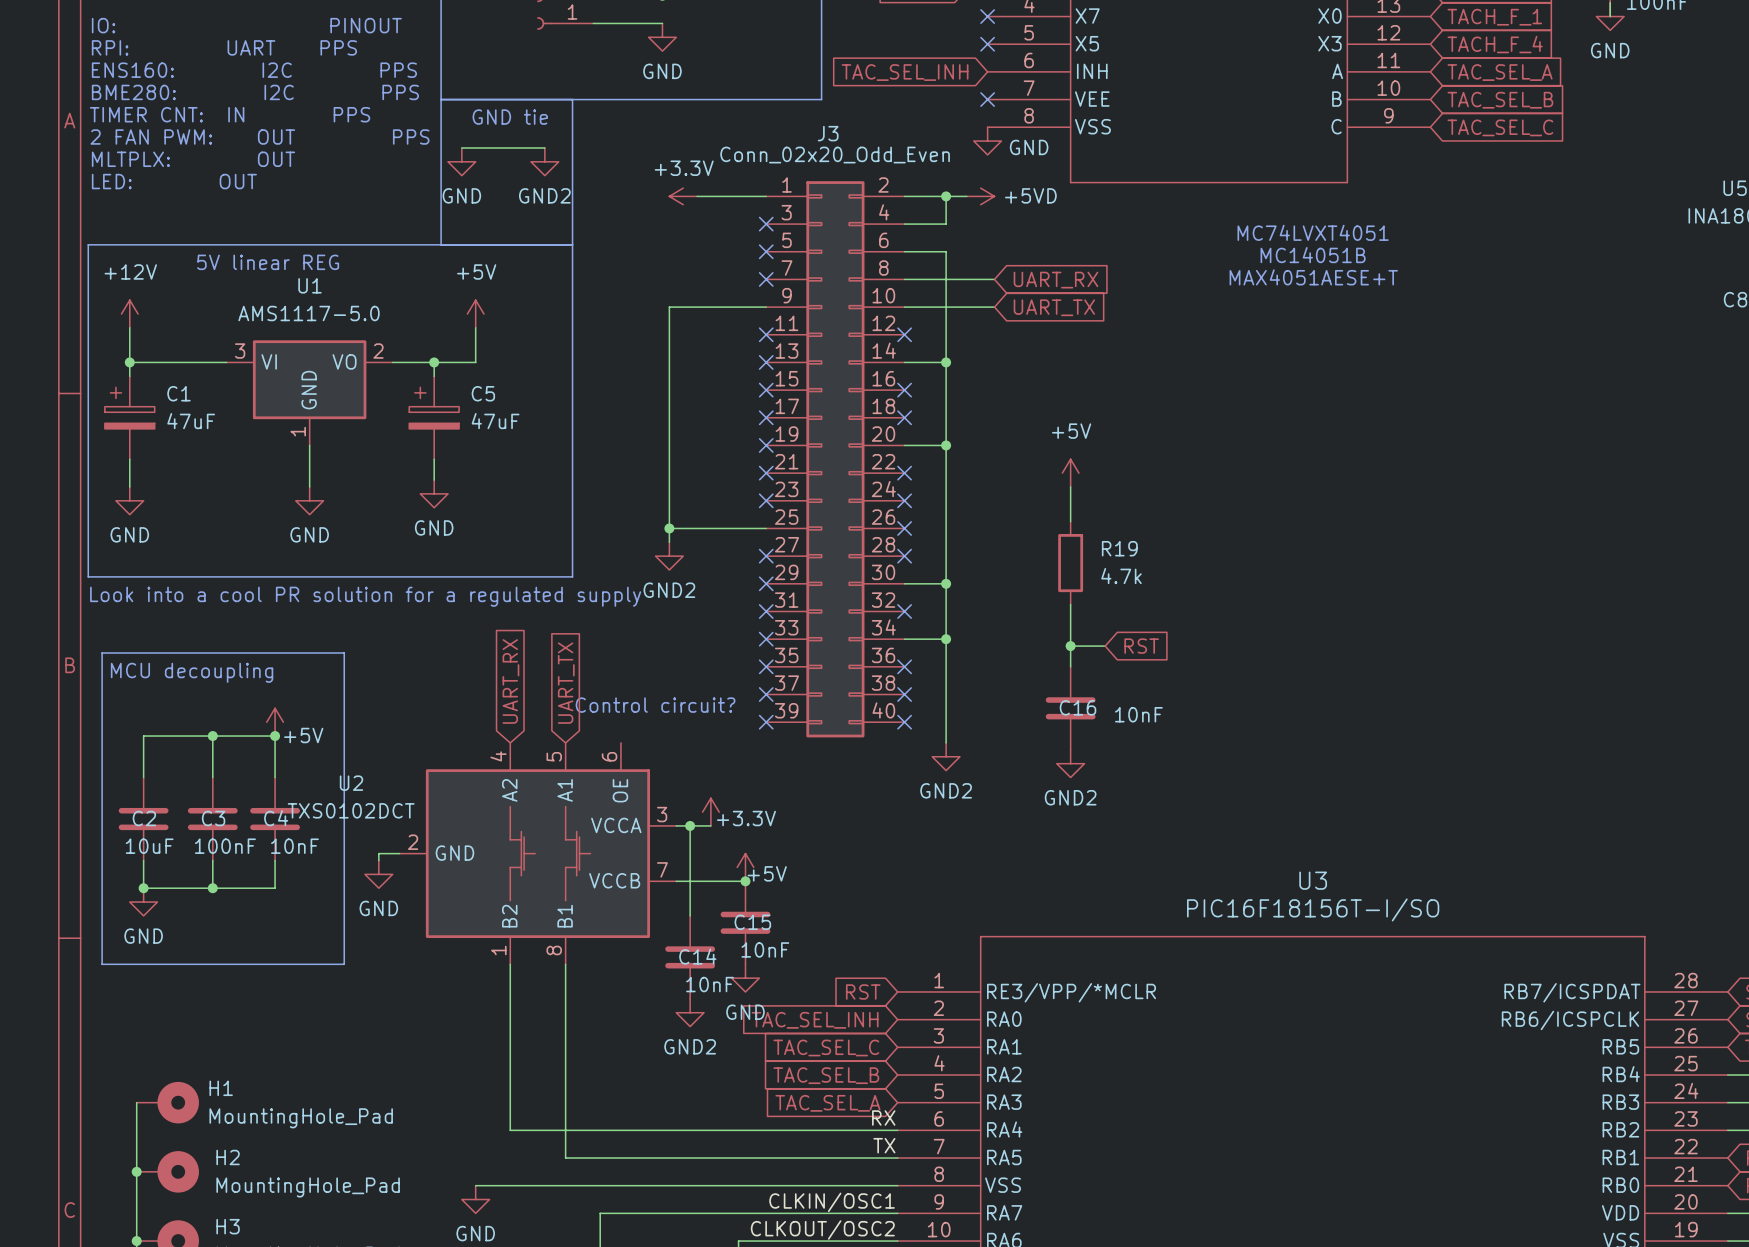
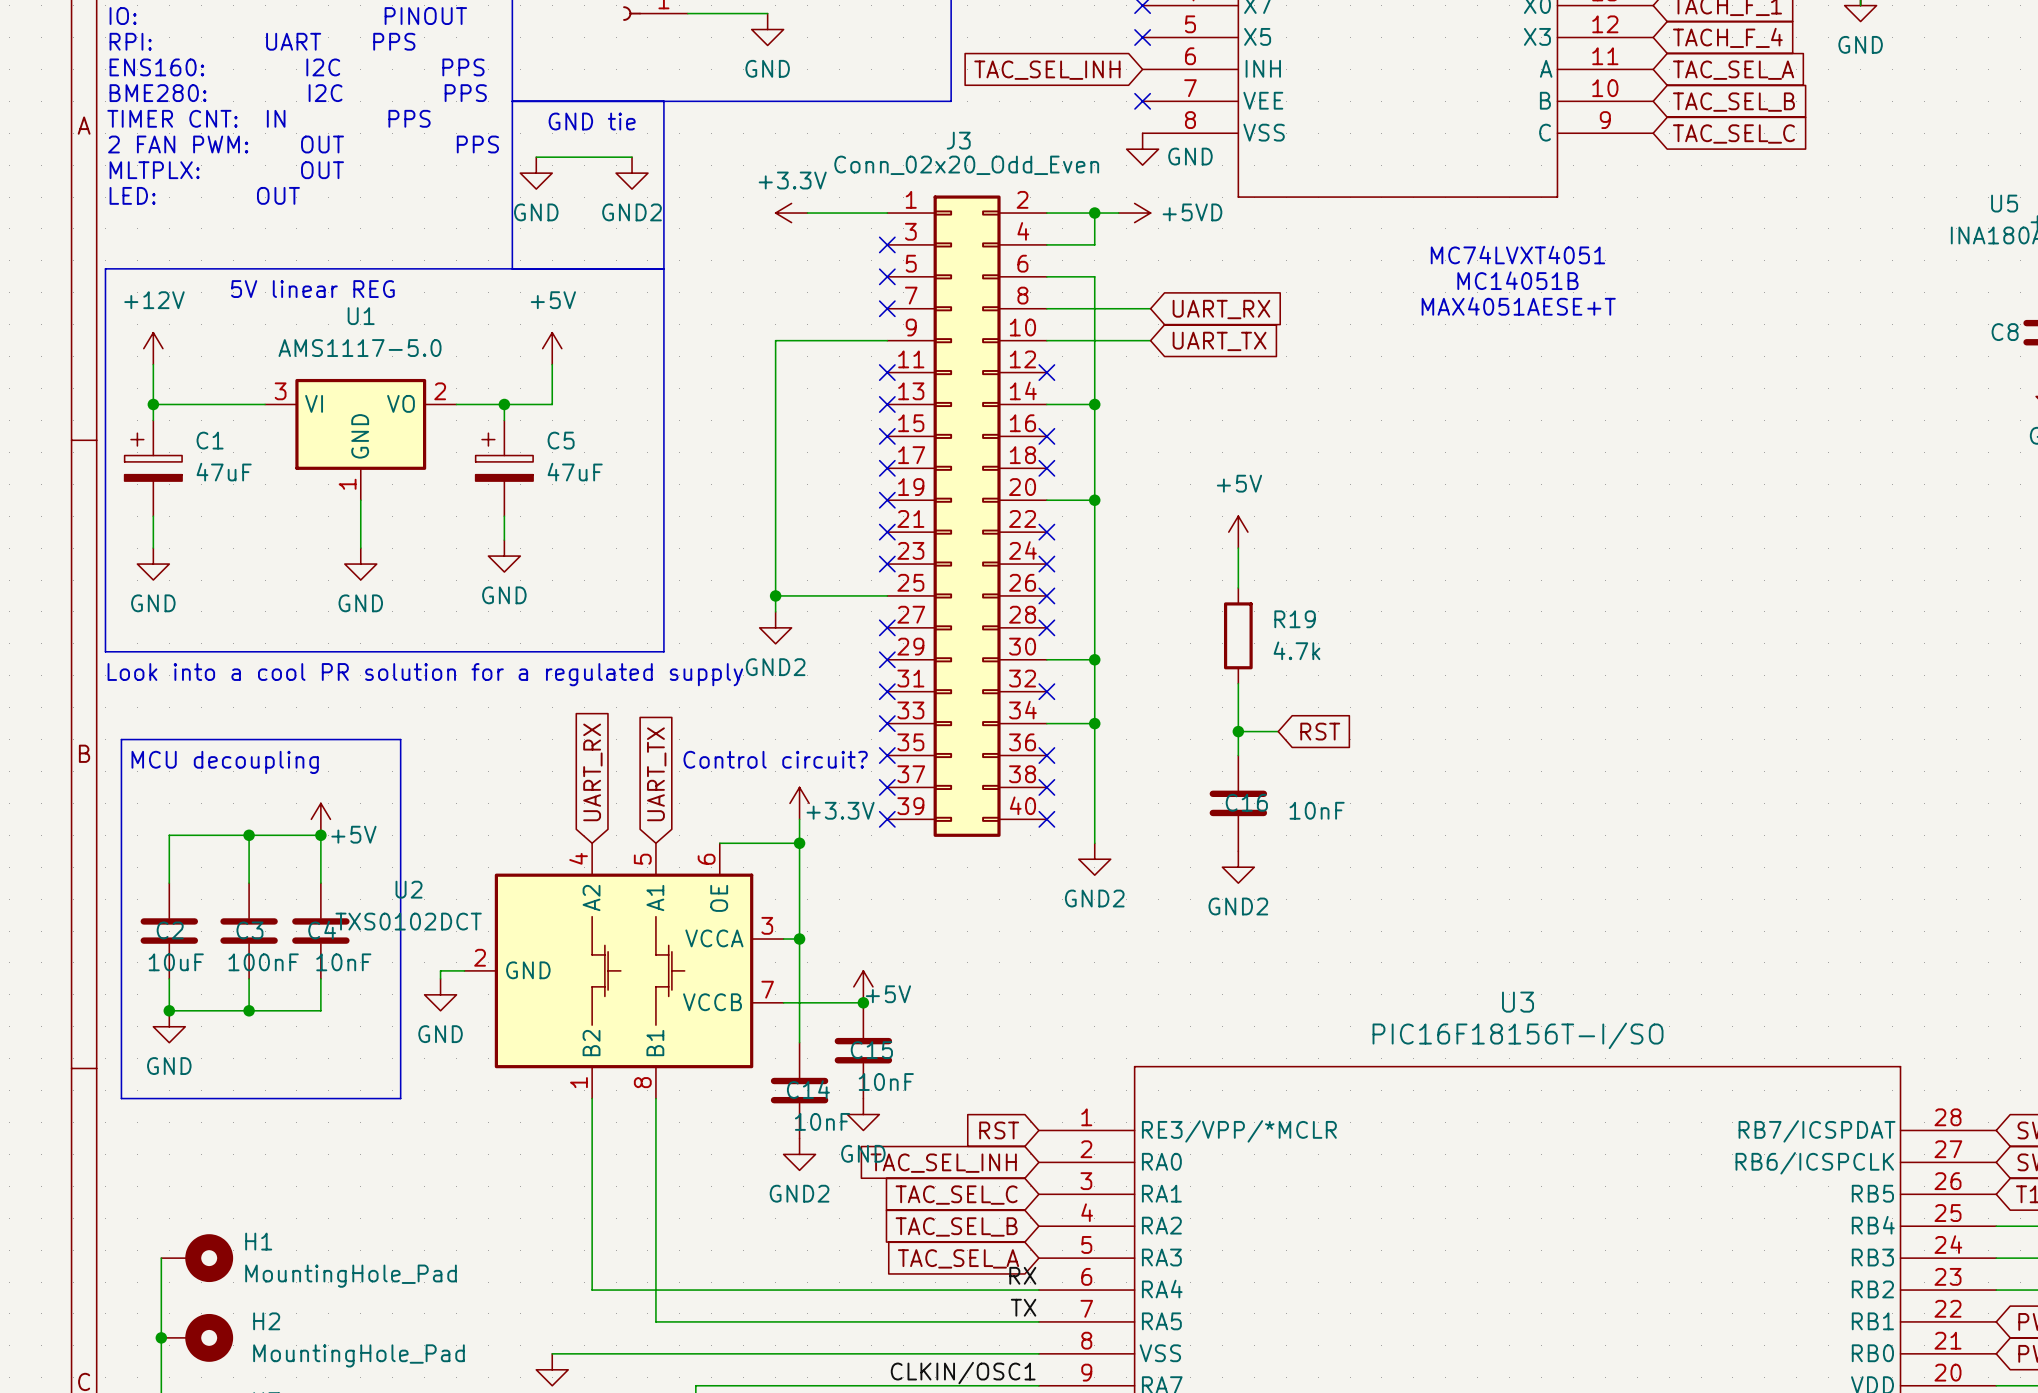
text position: Control circuit? (655, 705) -> Control circuit? (775, 759)
wire: none -> (719, 843) (799, 843)
junction: none -> (799, 843)
power symbol position: +3.3V (710, 812) -> +3.3V (799, 803)
wire: (690, 825) (710, 825) -> (799, 939) (799, 819)

